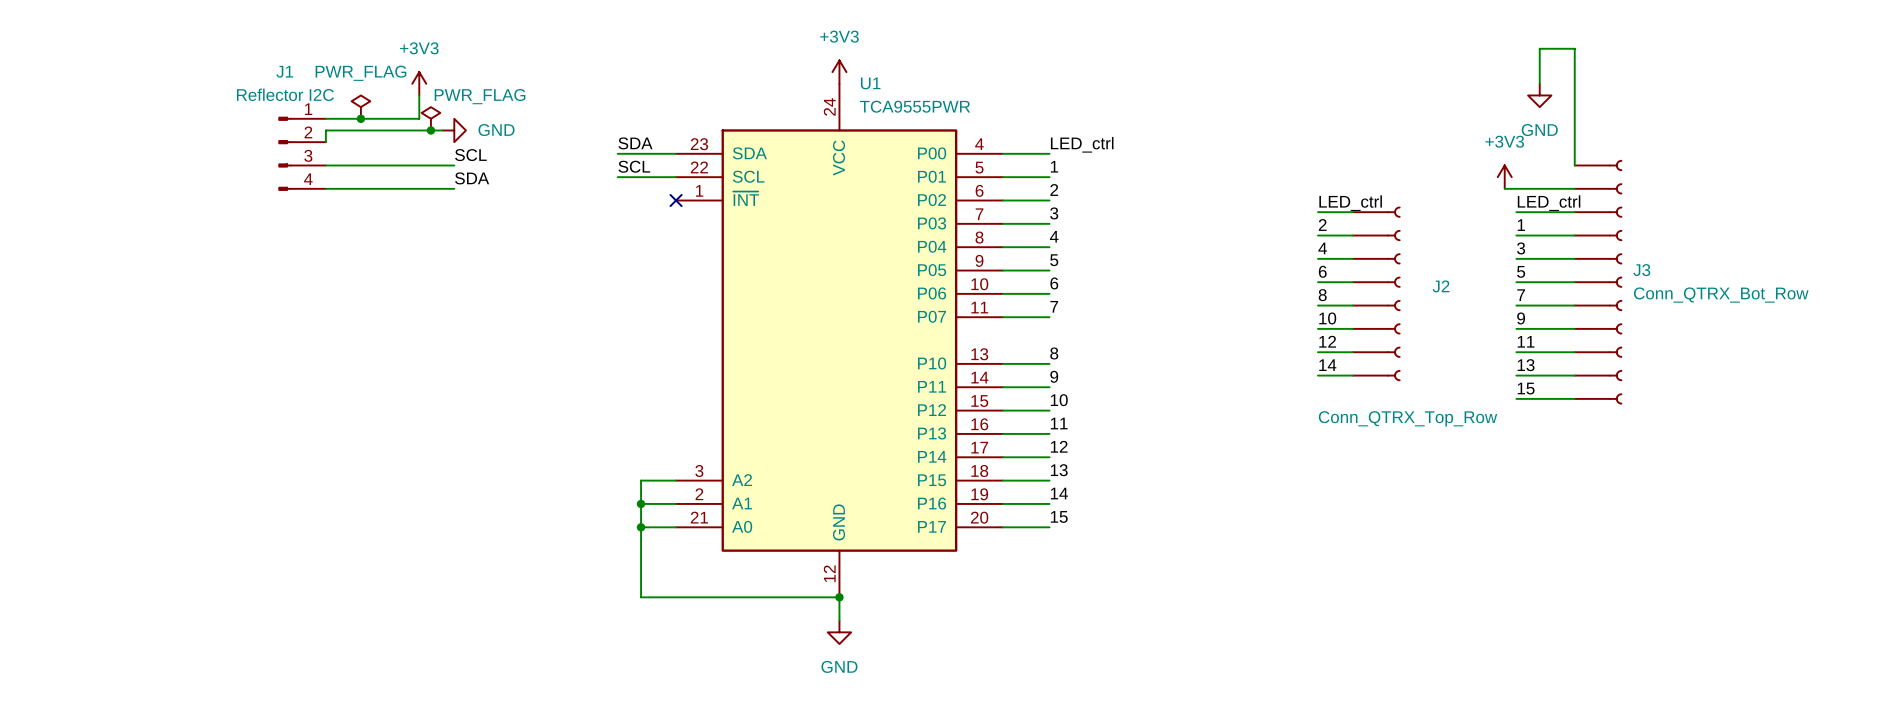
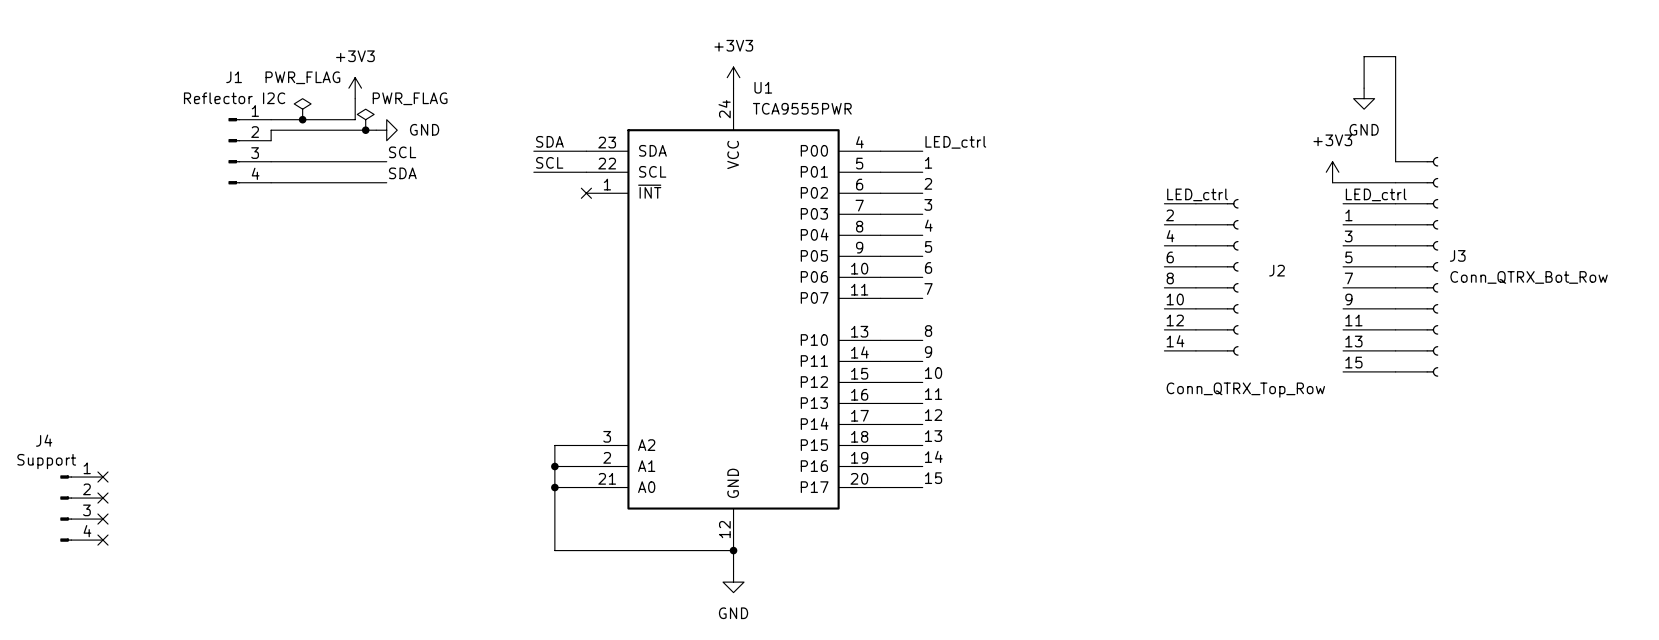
no-connect mark: none -> (102, 477)
no-connect mark: none -> (102, 498)
J4: none -> Support (81, 508)
no-connect mark: none -> (102, 519)
no-connect mark: none -> (102, 540)

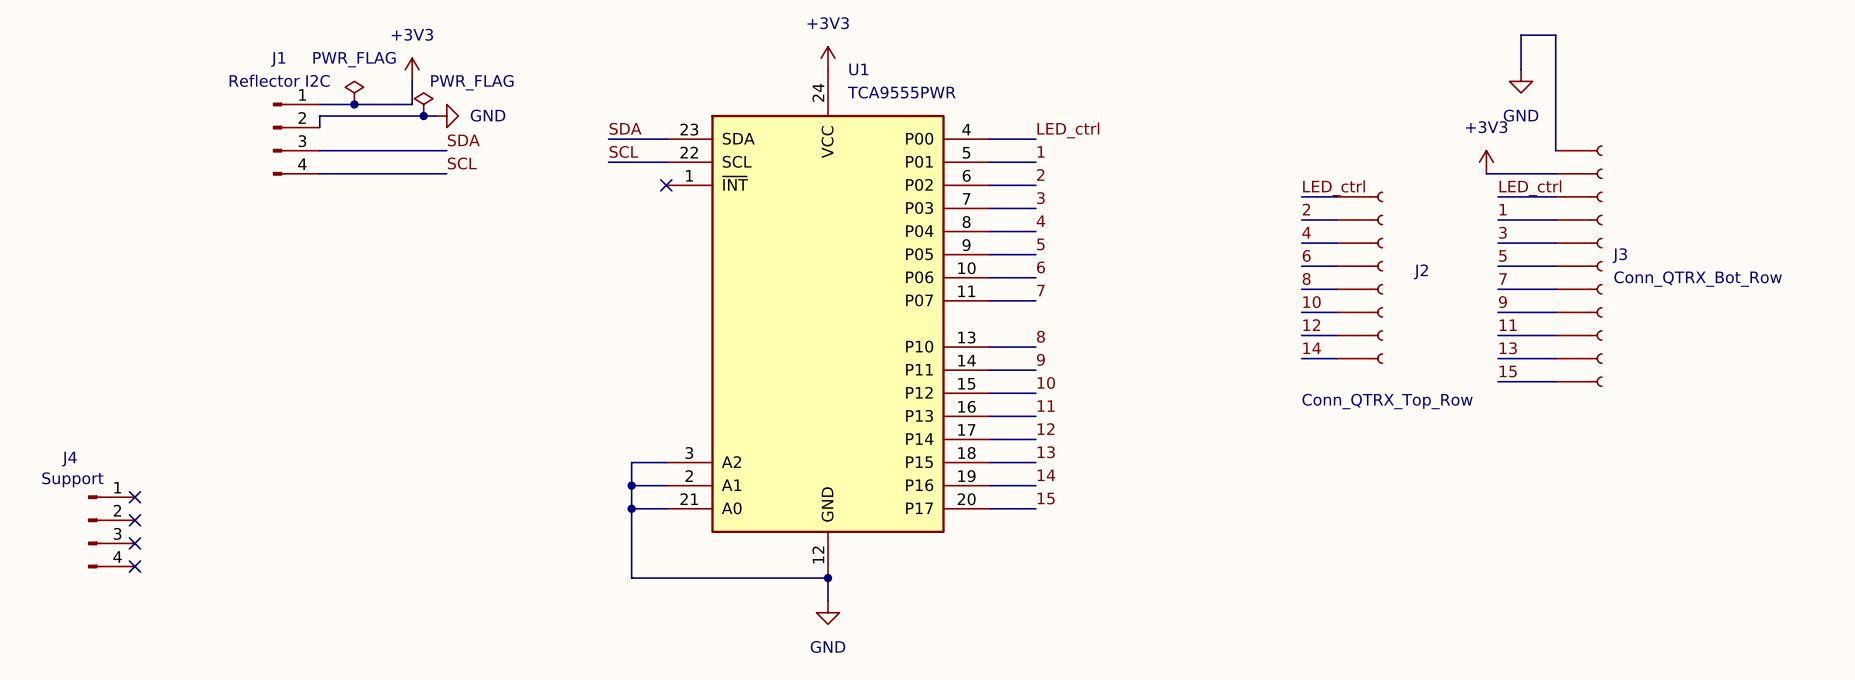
label: SCL (402, 152) -> SDA (463, 140)
label: SDA (402, 173) -> SCL (462, 163)

